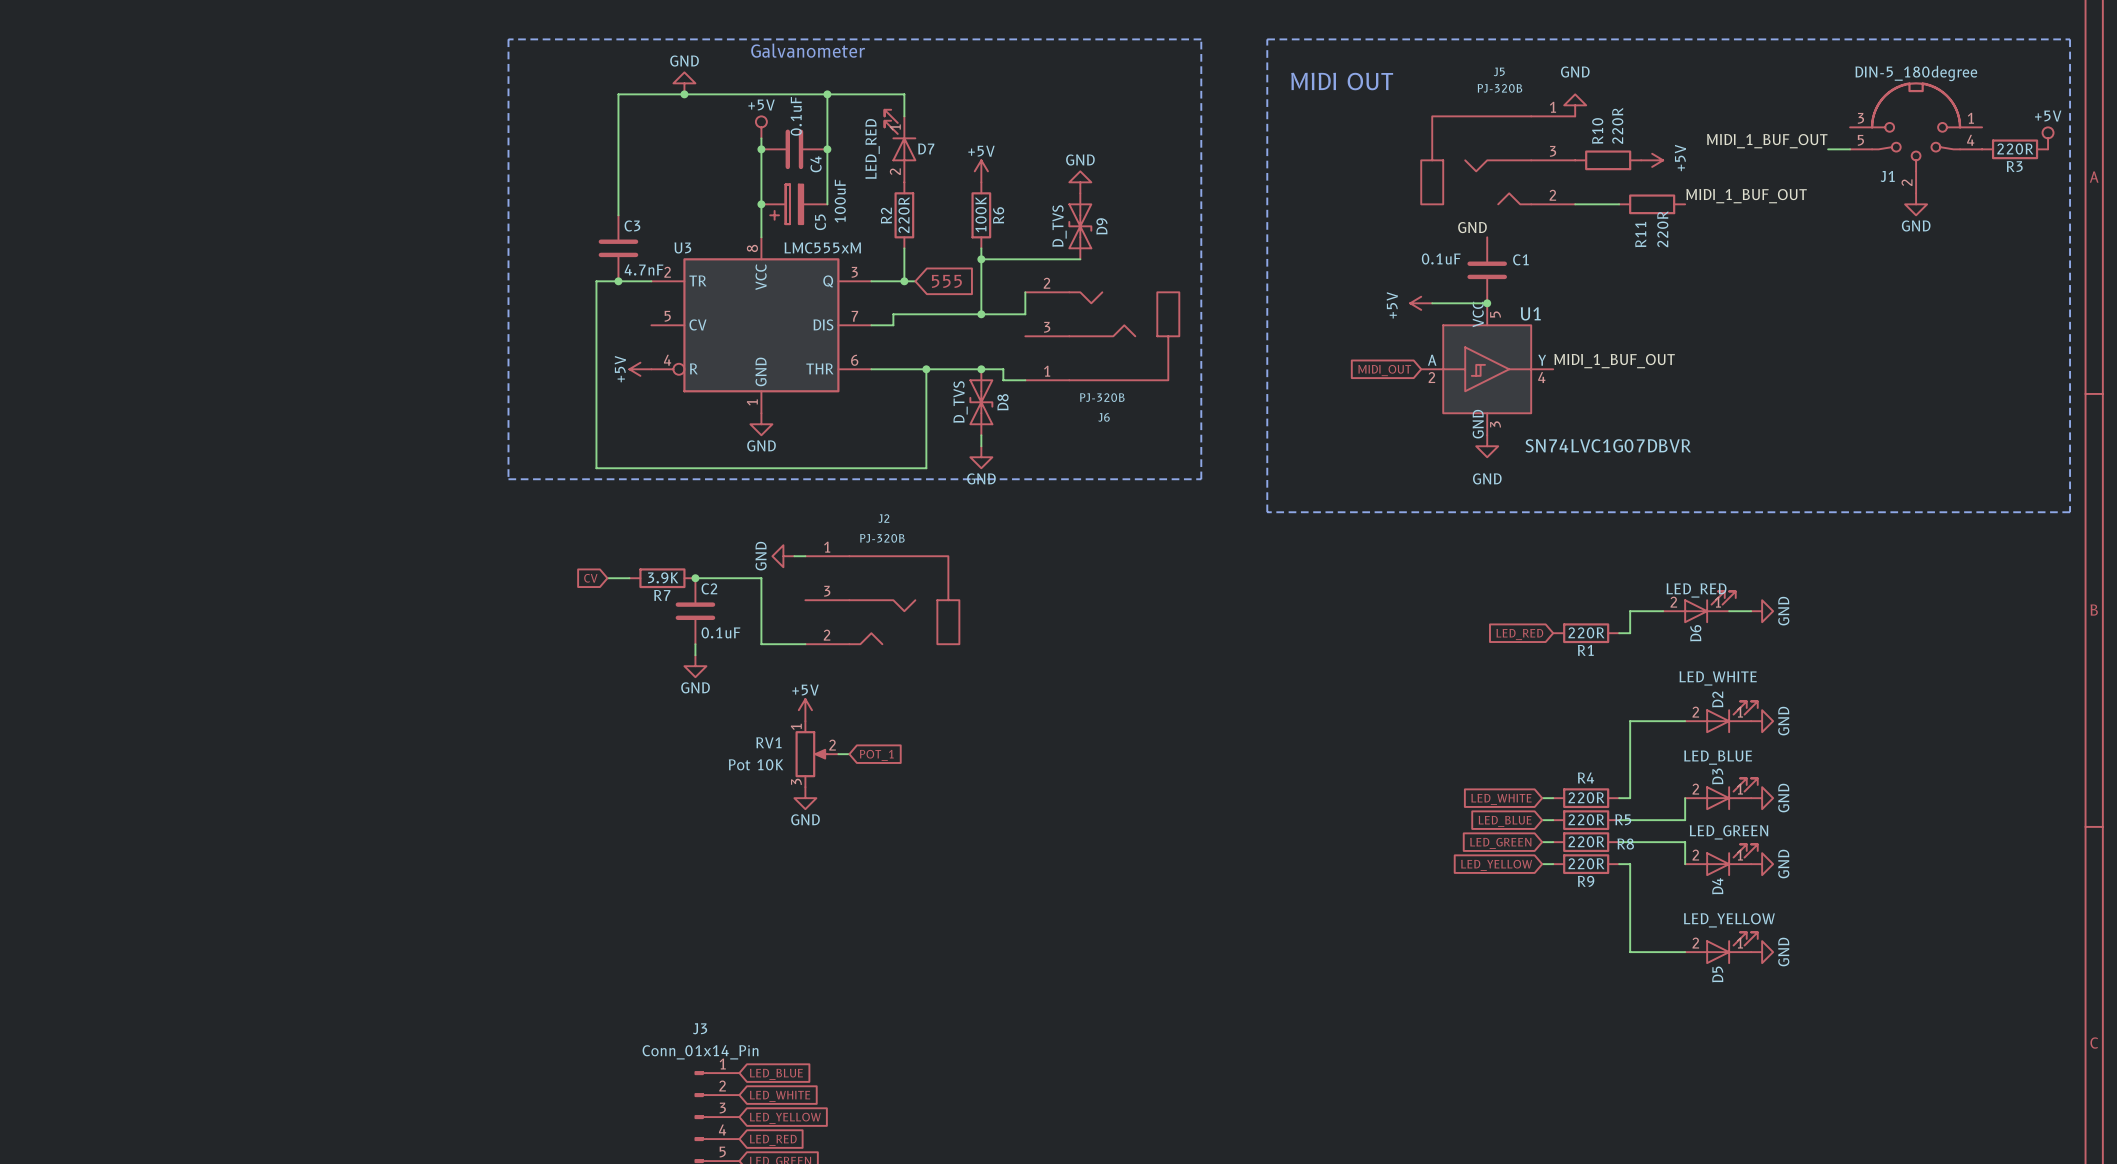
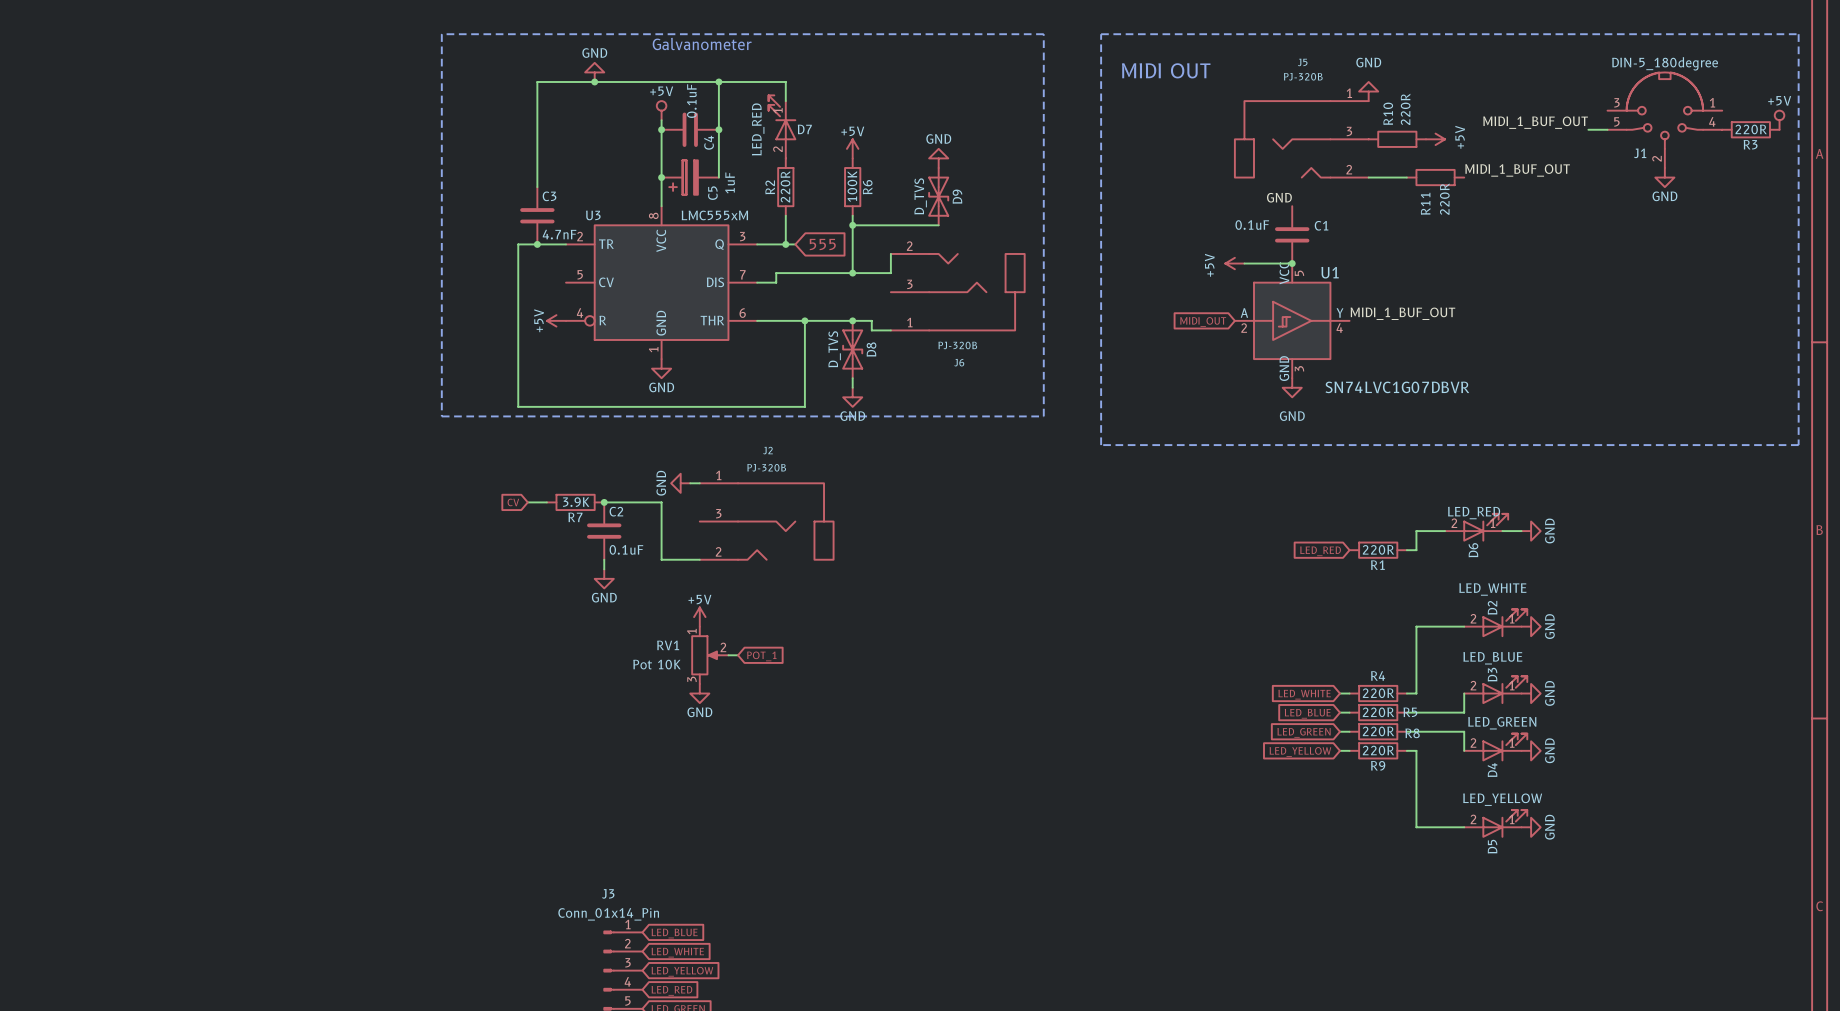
C5 value: 100uF (840, 201) -> 1uF (730, 182)

